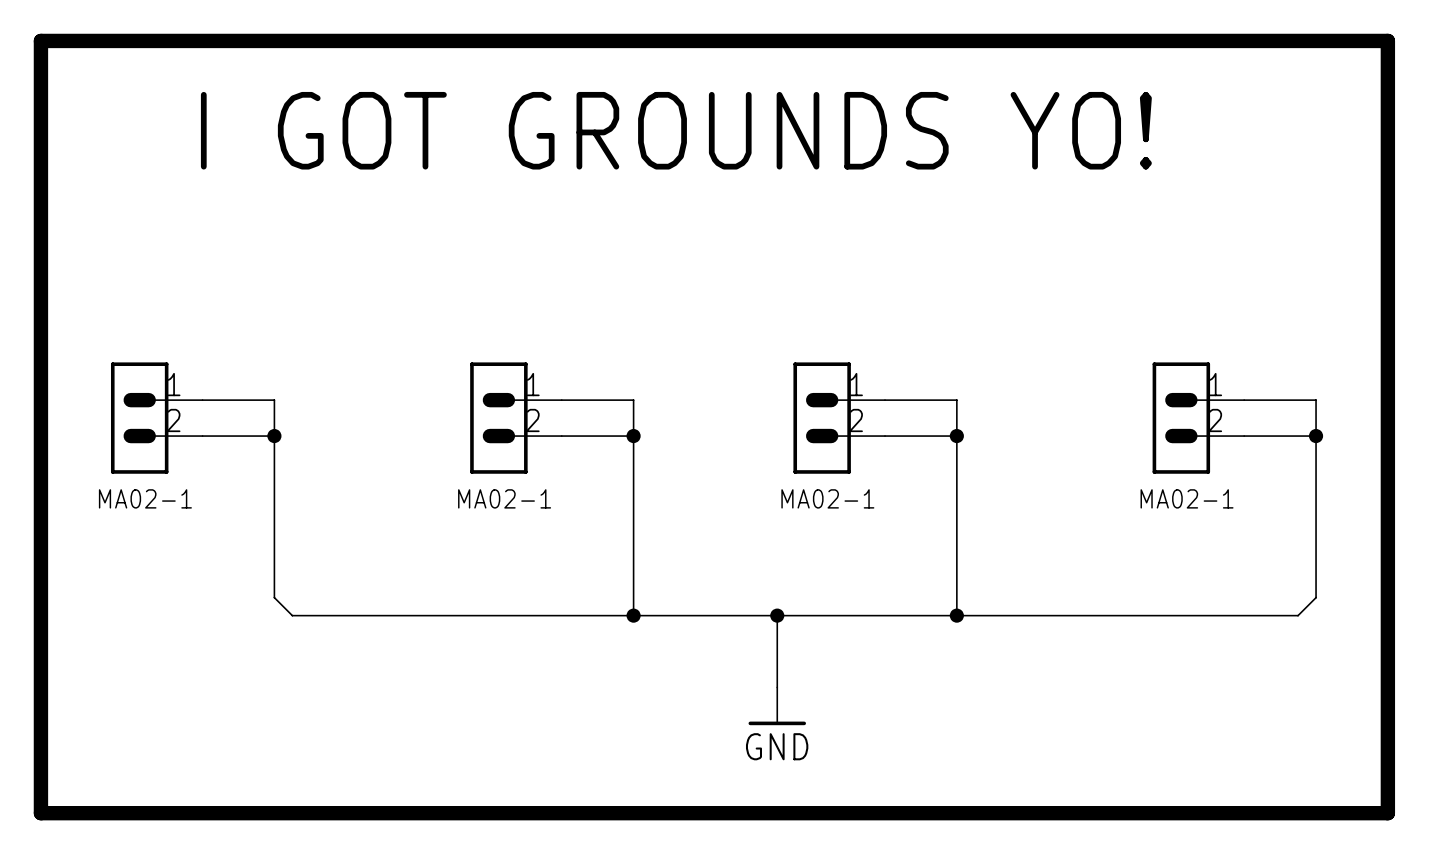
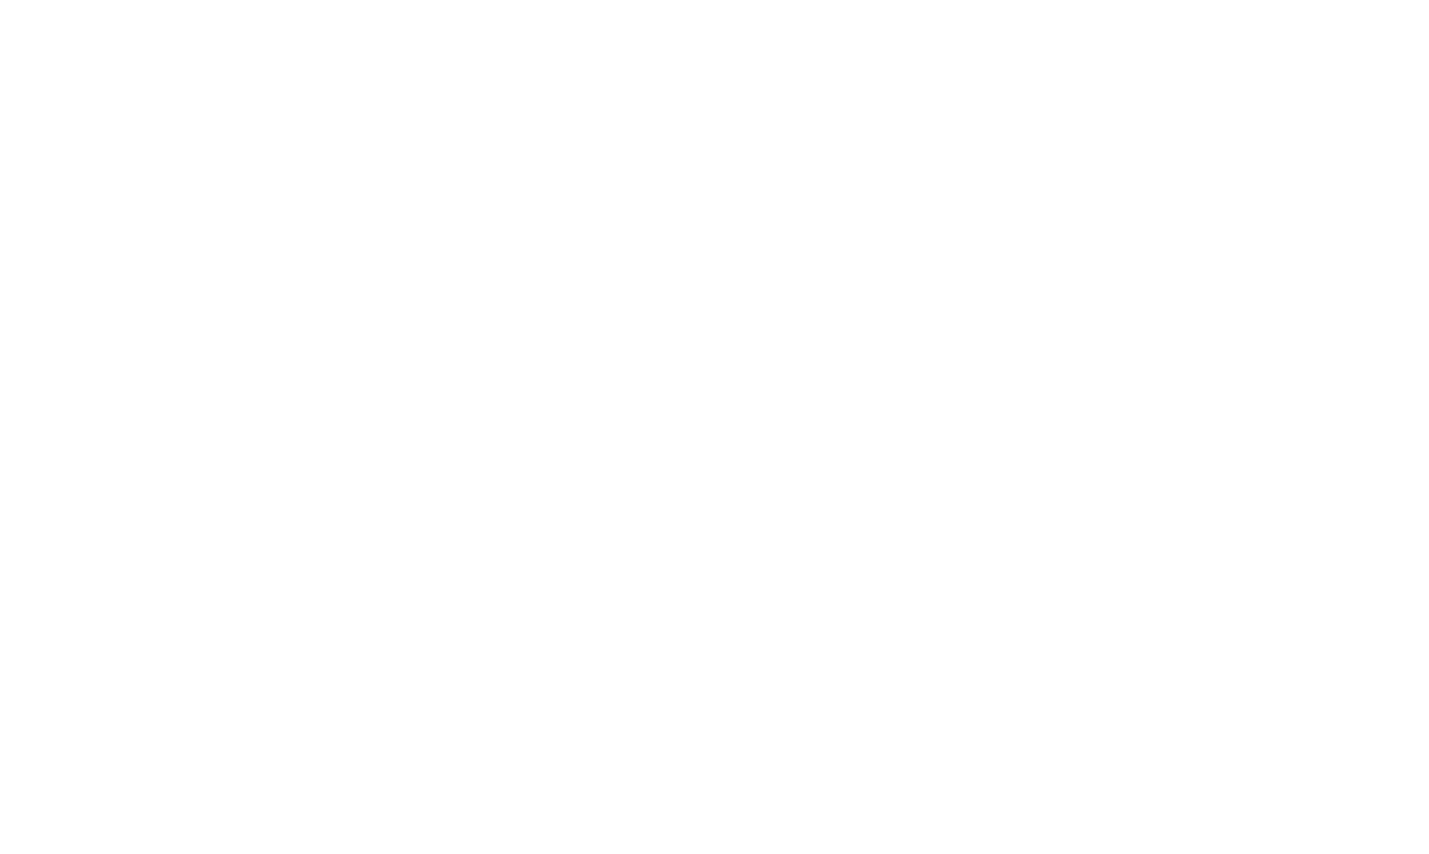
line: (40, 40) (1387, 40) (1387, 813) (40, 813) (40, 40) -> none
text: I GOT GROUNDS YO! (676, 130) -> none
wire: (202, 400) (274, 400) (274, 597) (292, 615) (1298, 615) (1316, 597) (1316, 400) (1244, 400) -> none
wire: (561, 400) (633, 400) (633, 615) -> none
wire: (885, 400) (956, 400) (956, 615) -> none
part: MA02-1 (156, 418) -> none
part: MA02-1 (515, 418) -> none
part: MA02-1 (839, 418) -> none
part: MA02-1 (1198, 418) -> none
wire: (202, 436) (274, 436) -> none
junction: (274, 436) -> none
wire: (561, 436) (633, 436) -> none
junction: (633, 436) -> none
wire: (885, 436) (956, 436) -> none
junction: (956, 436) -> none
wire: (1244, 436) (1316, 436) -> none
junction: (1316, 436) -> none
junction: (633, 615) -> none
wire: (777, 615) (777, 687) -> none
junction: (777, 615) -> none
junction: (956, 615) -> none
power symbol: GND (777, 706) -> none

